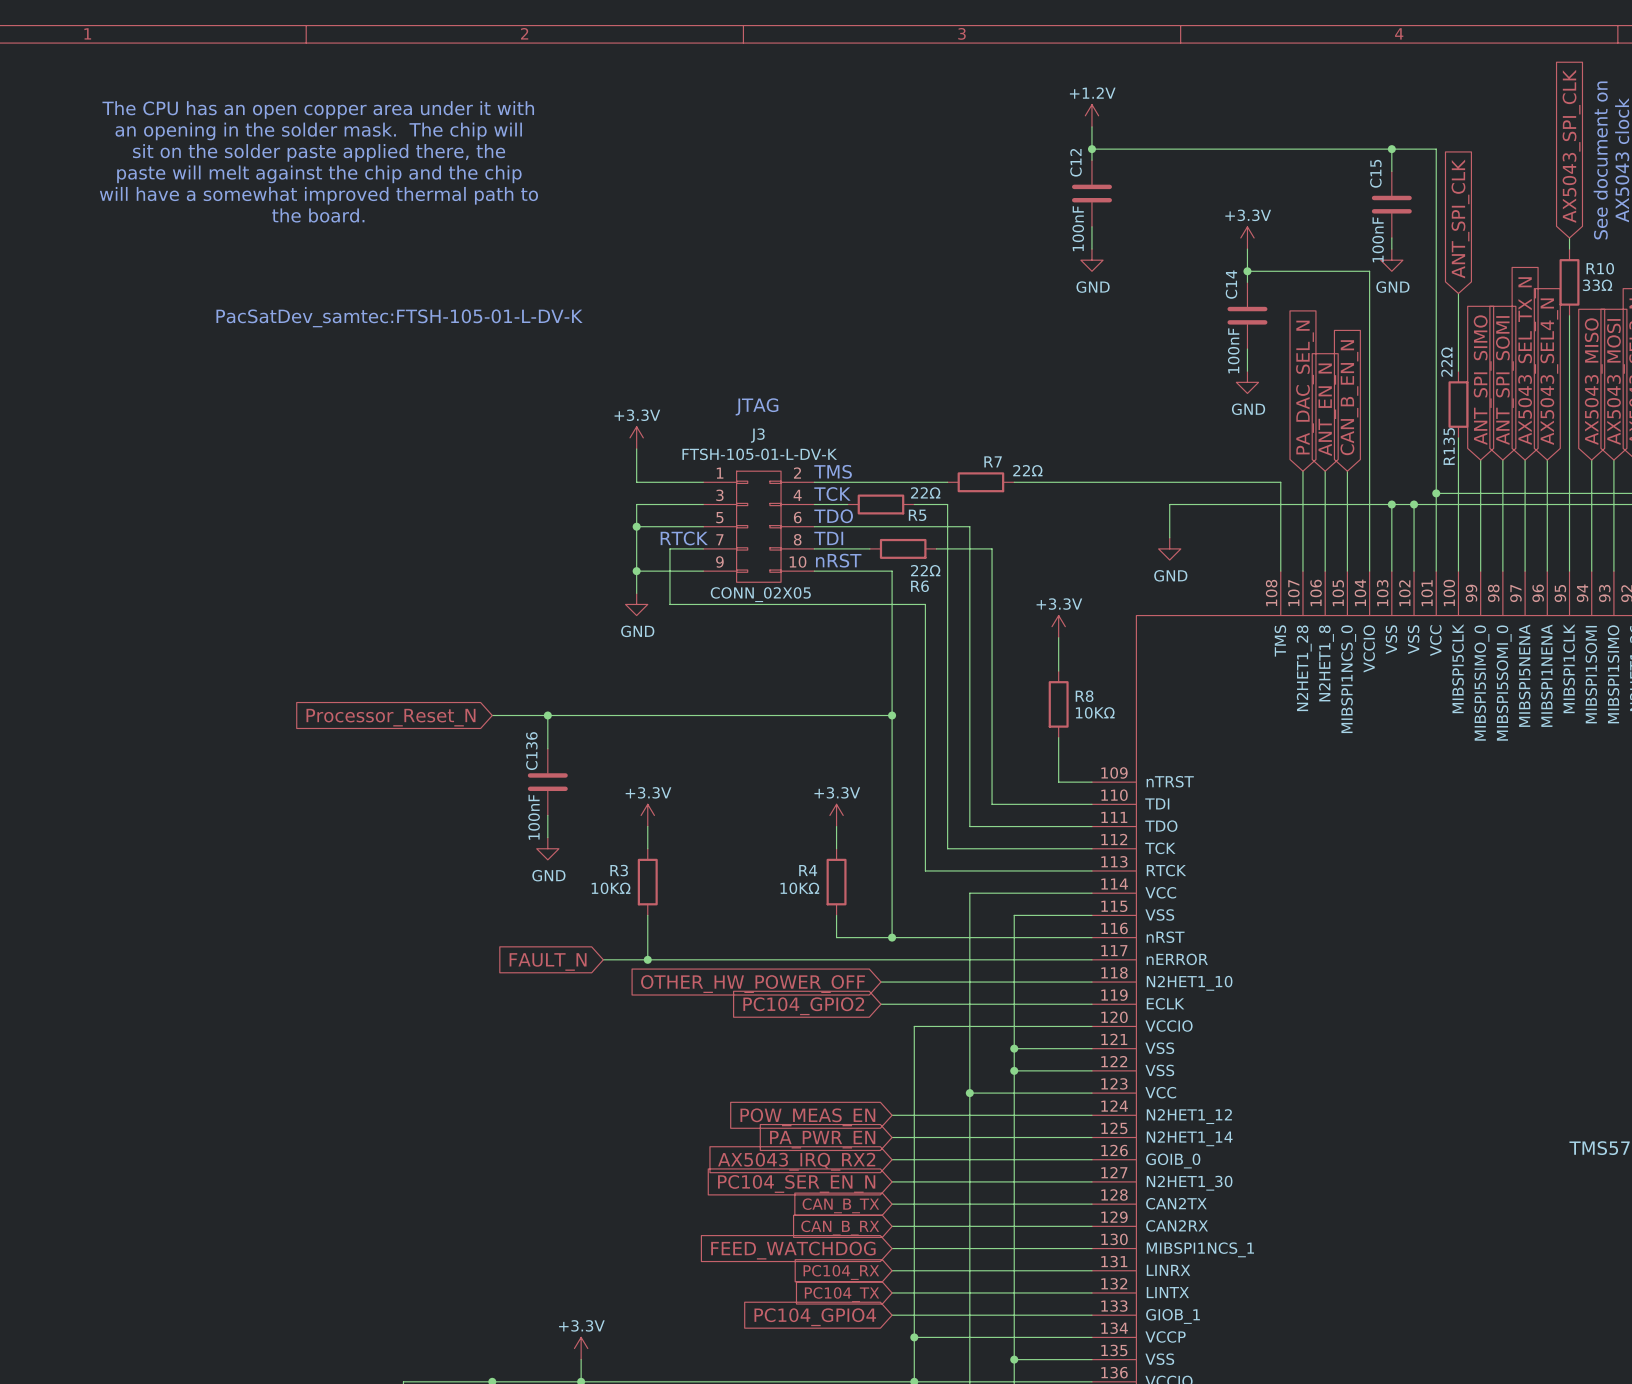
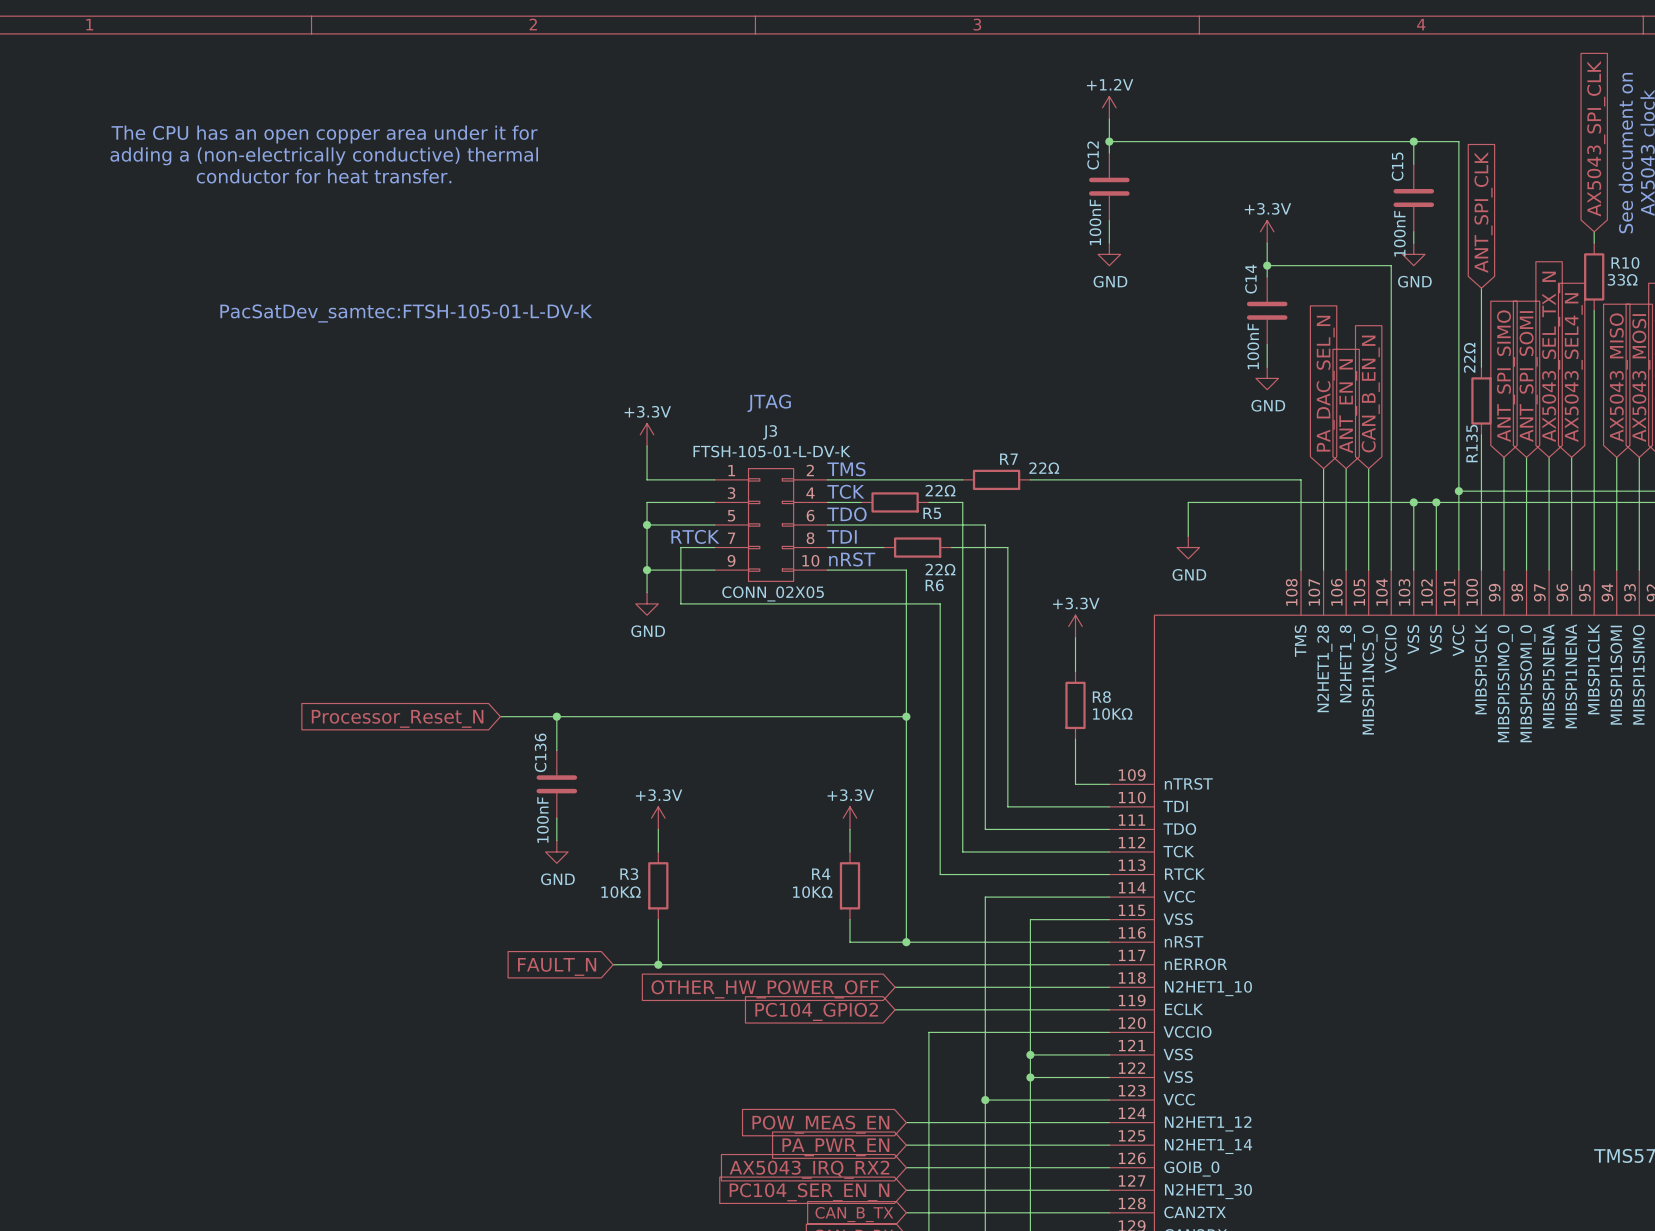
text: The CPU has an open copper area under it with (318, 109) -> none
text: an opening in the solder mask. The chip will (318, 131) -> none
text: none -> The CPU has an open copper area under it for (324, 134)
text: sit on the solder paste applied there, the (319, 152) -> none
text: none -> adding a (non-electrically conductive) thermal (324, 156)
text: paste will melt against the chip and the chip (319, 174) -> none
text: none -> conductor for heat transfer. (324, 176)
text: will have a somewhat improved thermal path to (318, 195) -> none
text: the board. (318, 215) -> none

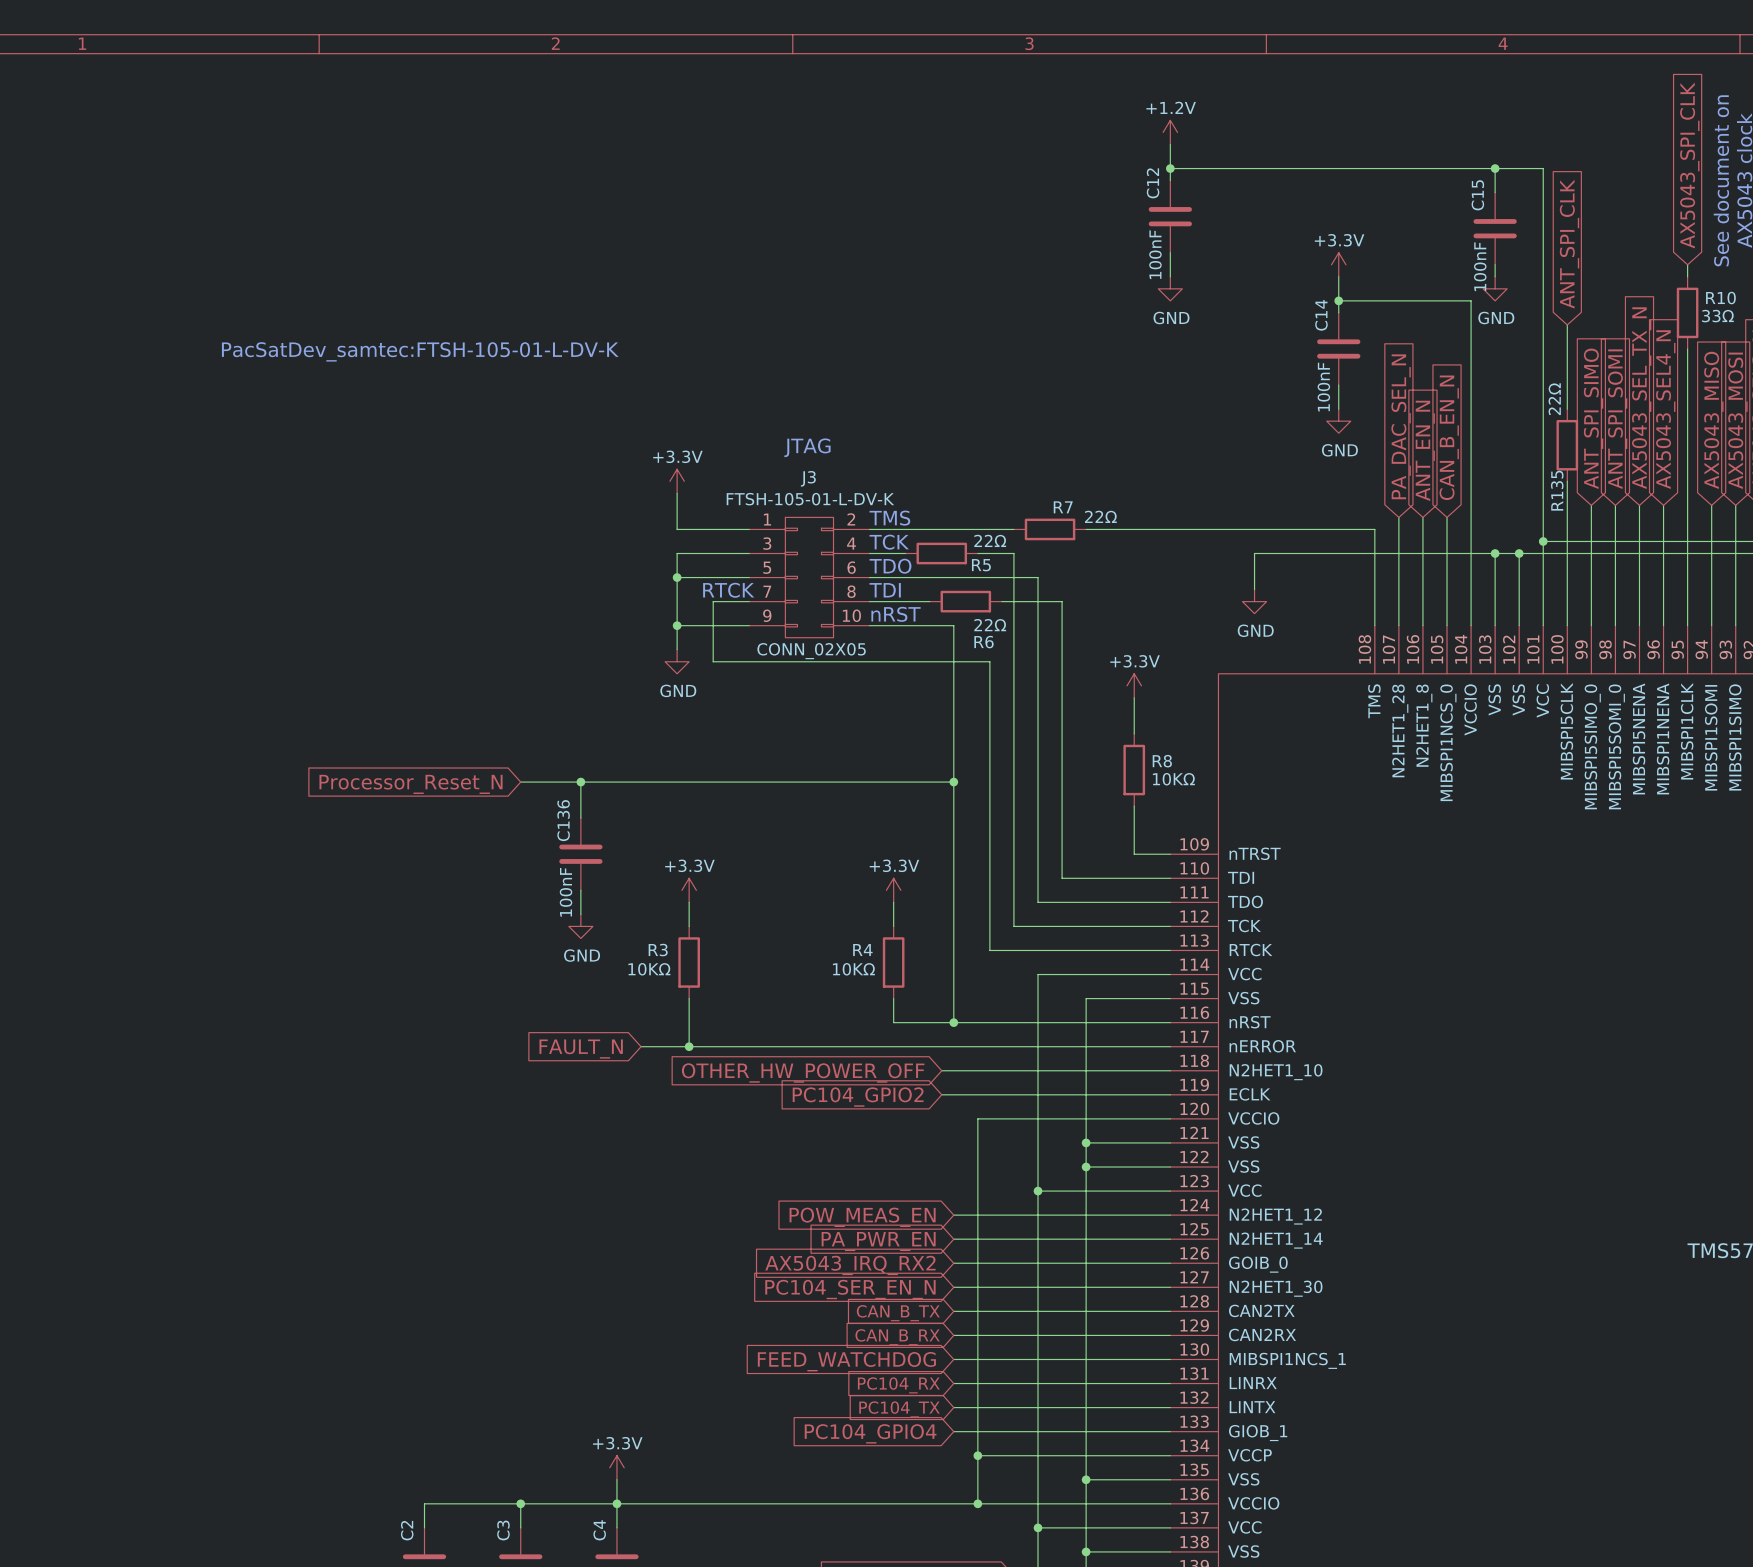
text: The CPU has an open copper area under it for (324, 134) -> none
text: adding a (non-electrically conductive) thermal (324, 156) -> none
text: conductor for heat transfer. (324, 176) -> none

